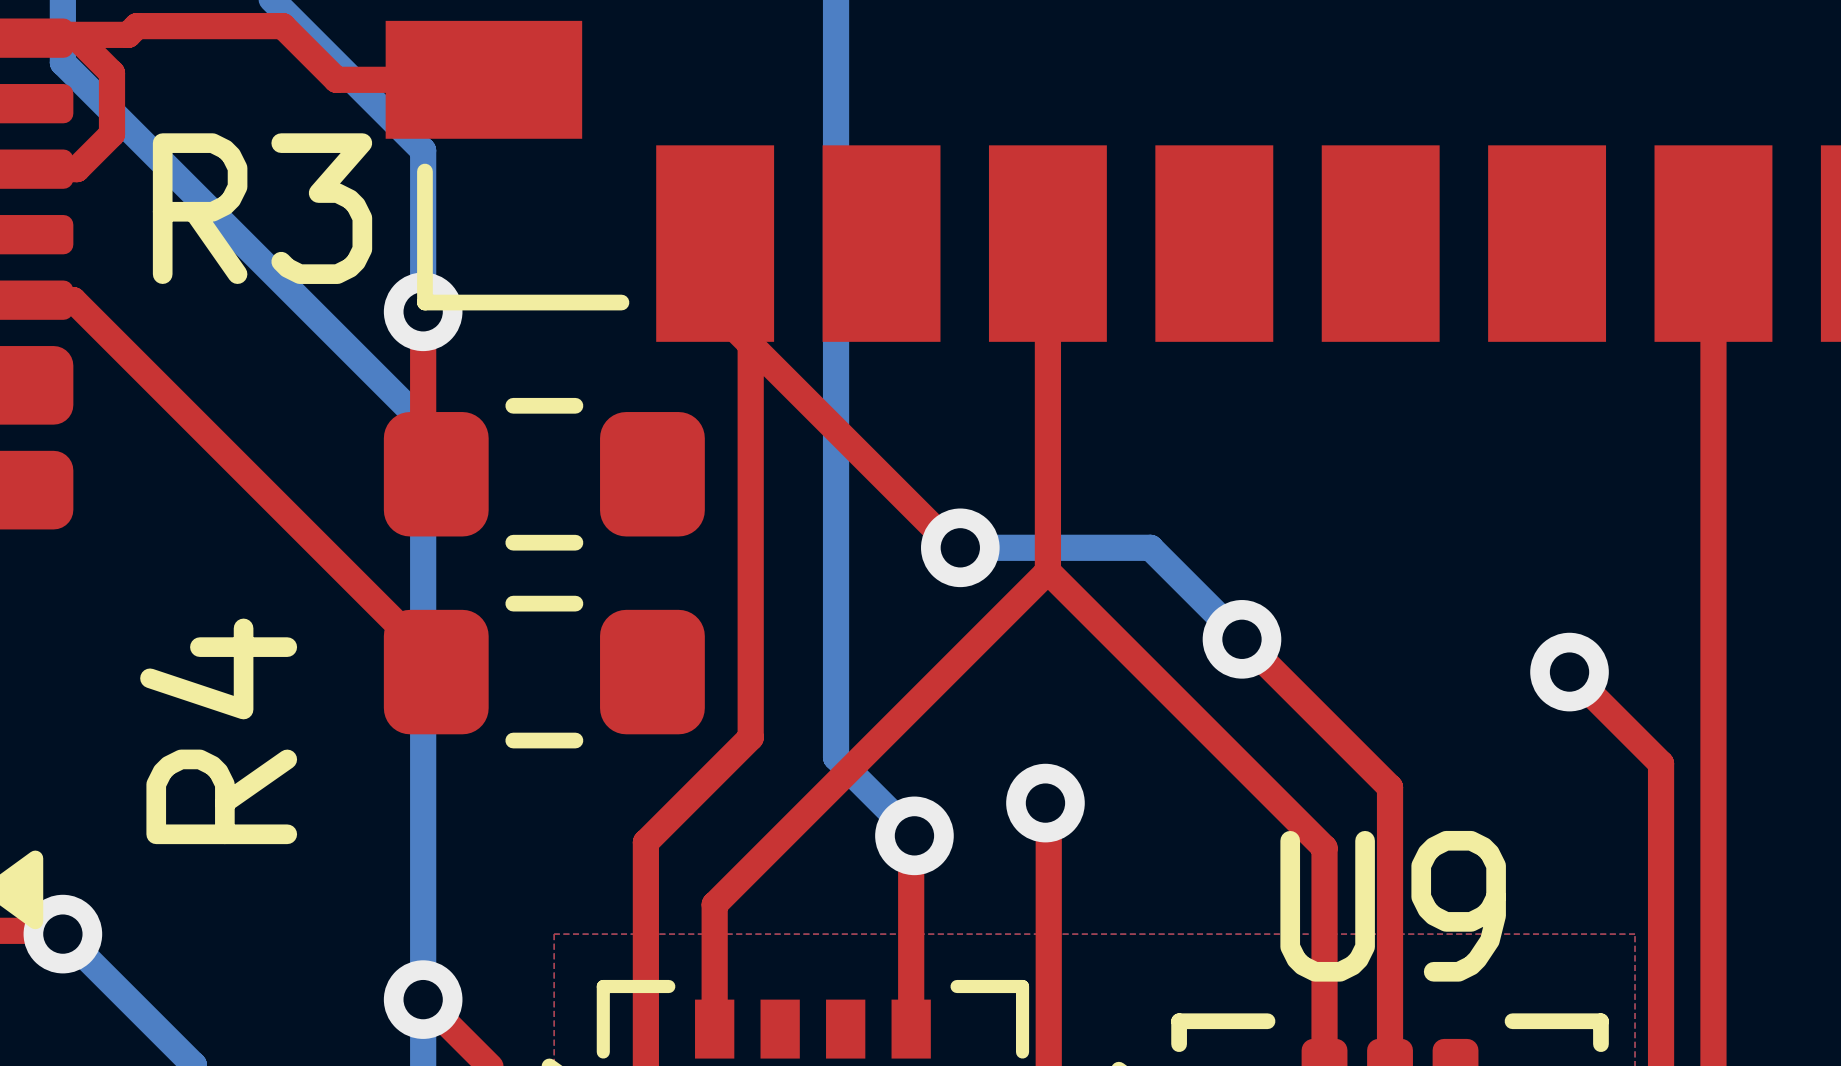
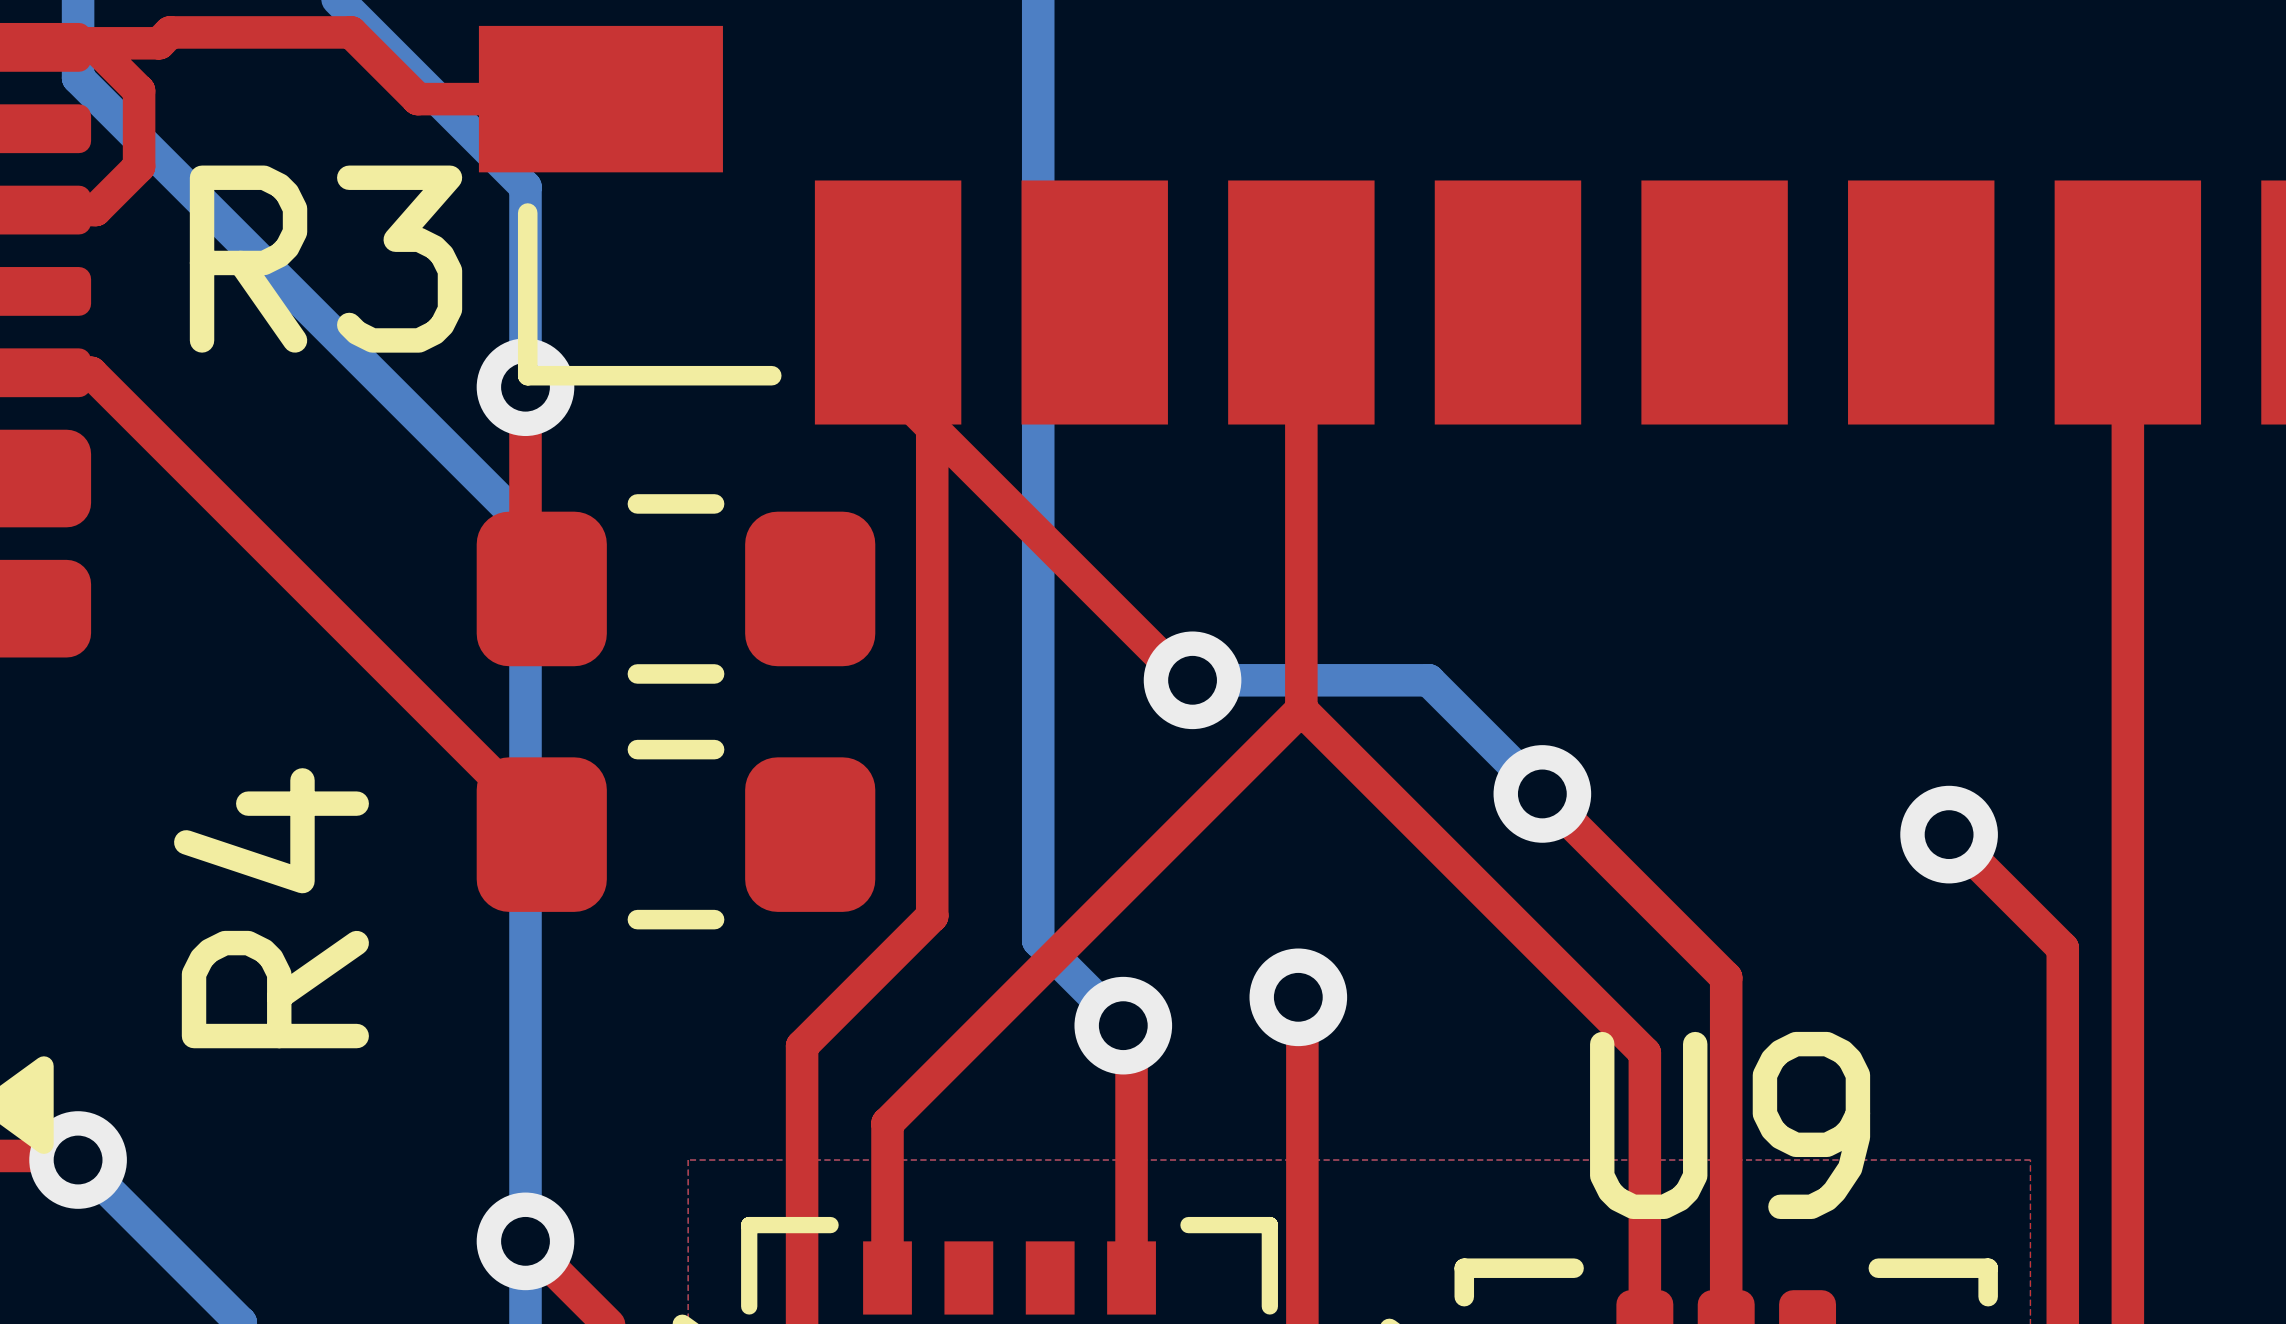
via position: (914, 835) -> (1123, 1025)

